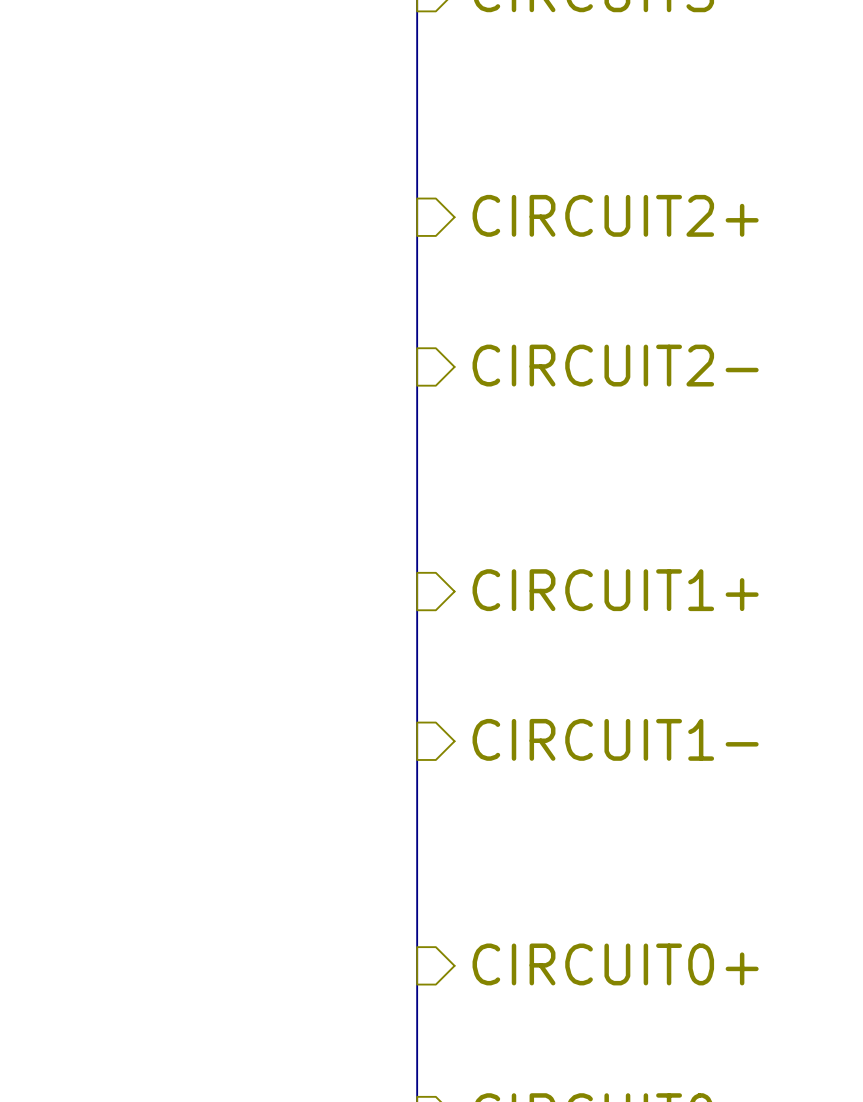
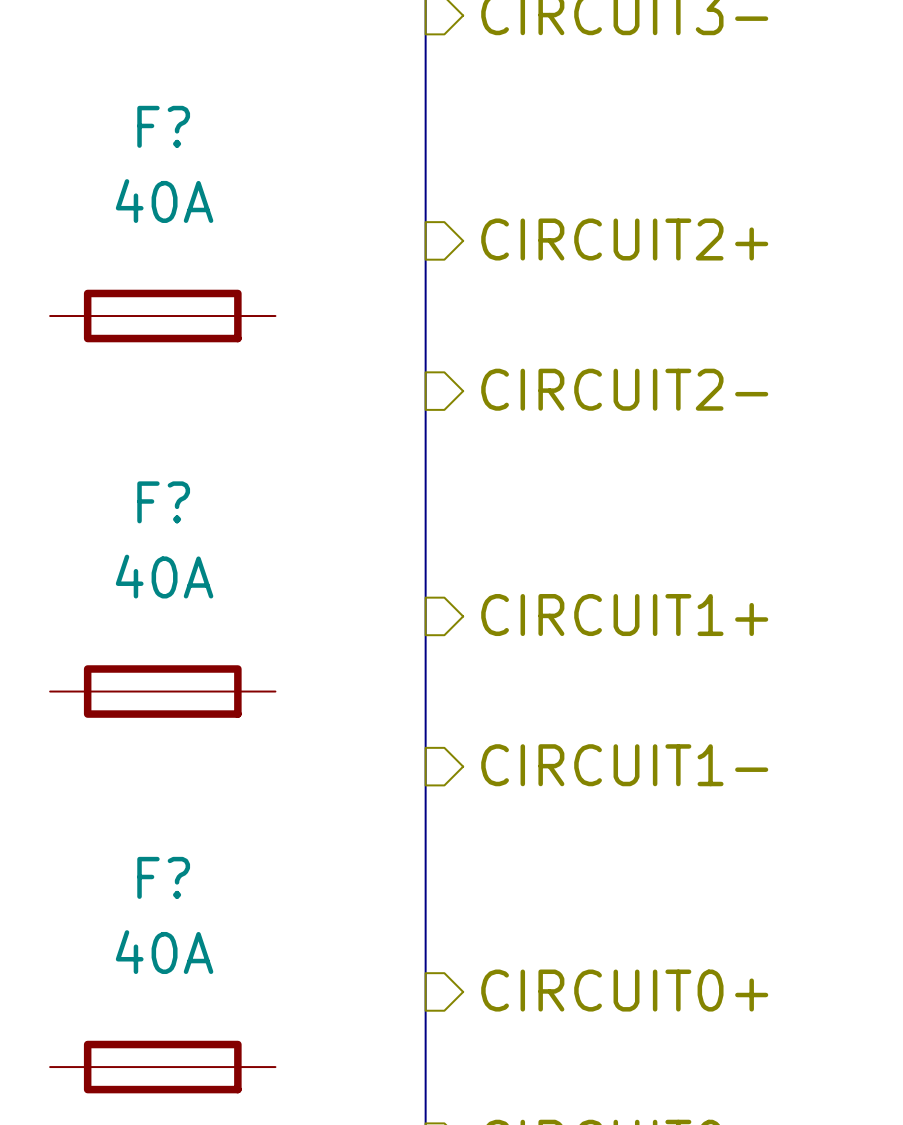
F?: none -> 40A (162, 316)
F?: none -> 40A (162, 691)
F?: none -> 40A (162, 1067)

